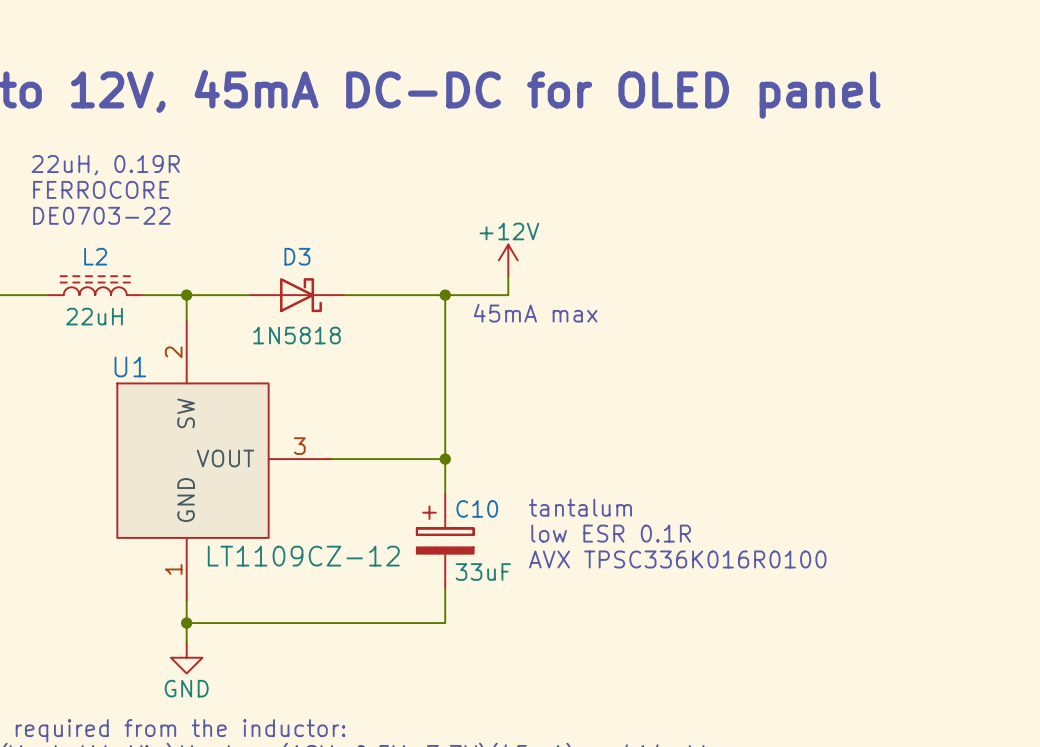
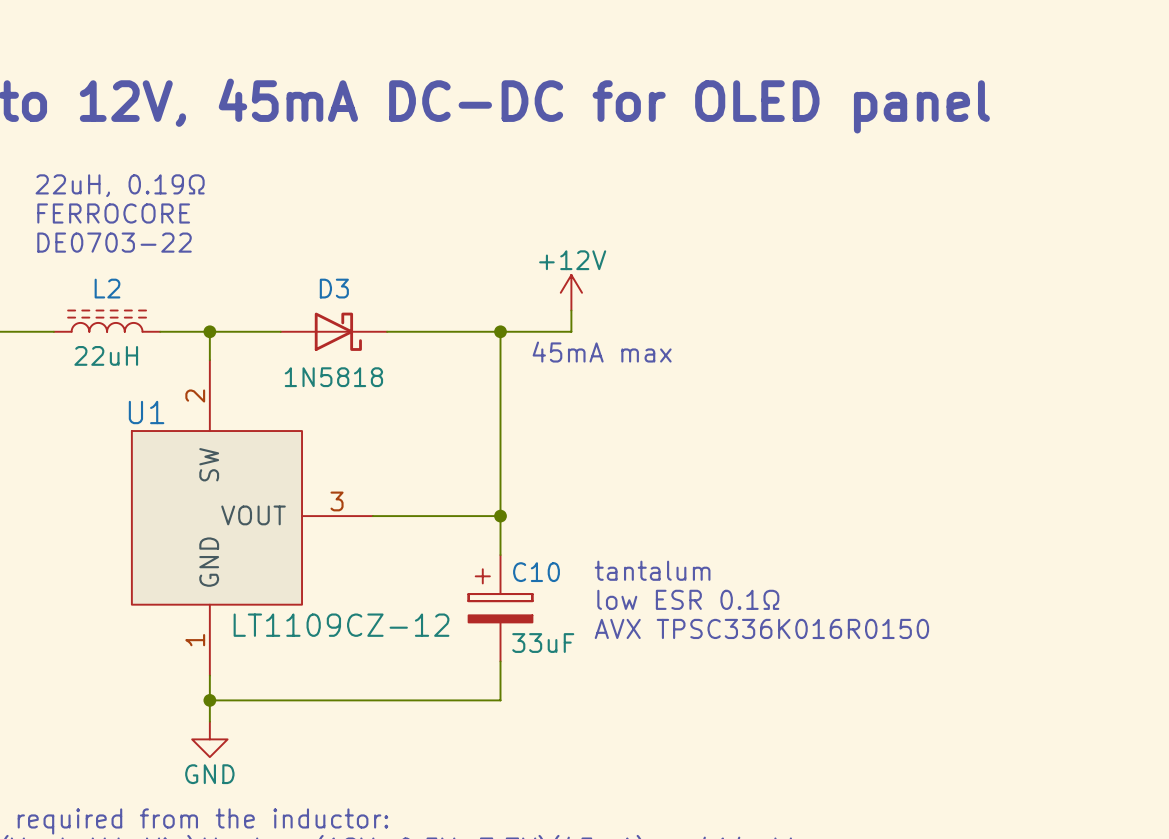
text: 22uH, 0.19R (105, 165) -> 22uH, 0.19Ω (120, 185)
text: low ESR 0.1R (611, 533) -> low ESR 0.1Ω (688, 599)
text: AVX TPSC336K016R0100 (677, 559) -> AVX TPSC336K016R0150 (761, 628)

